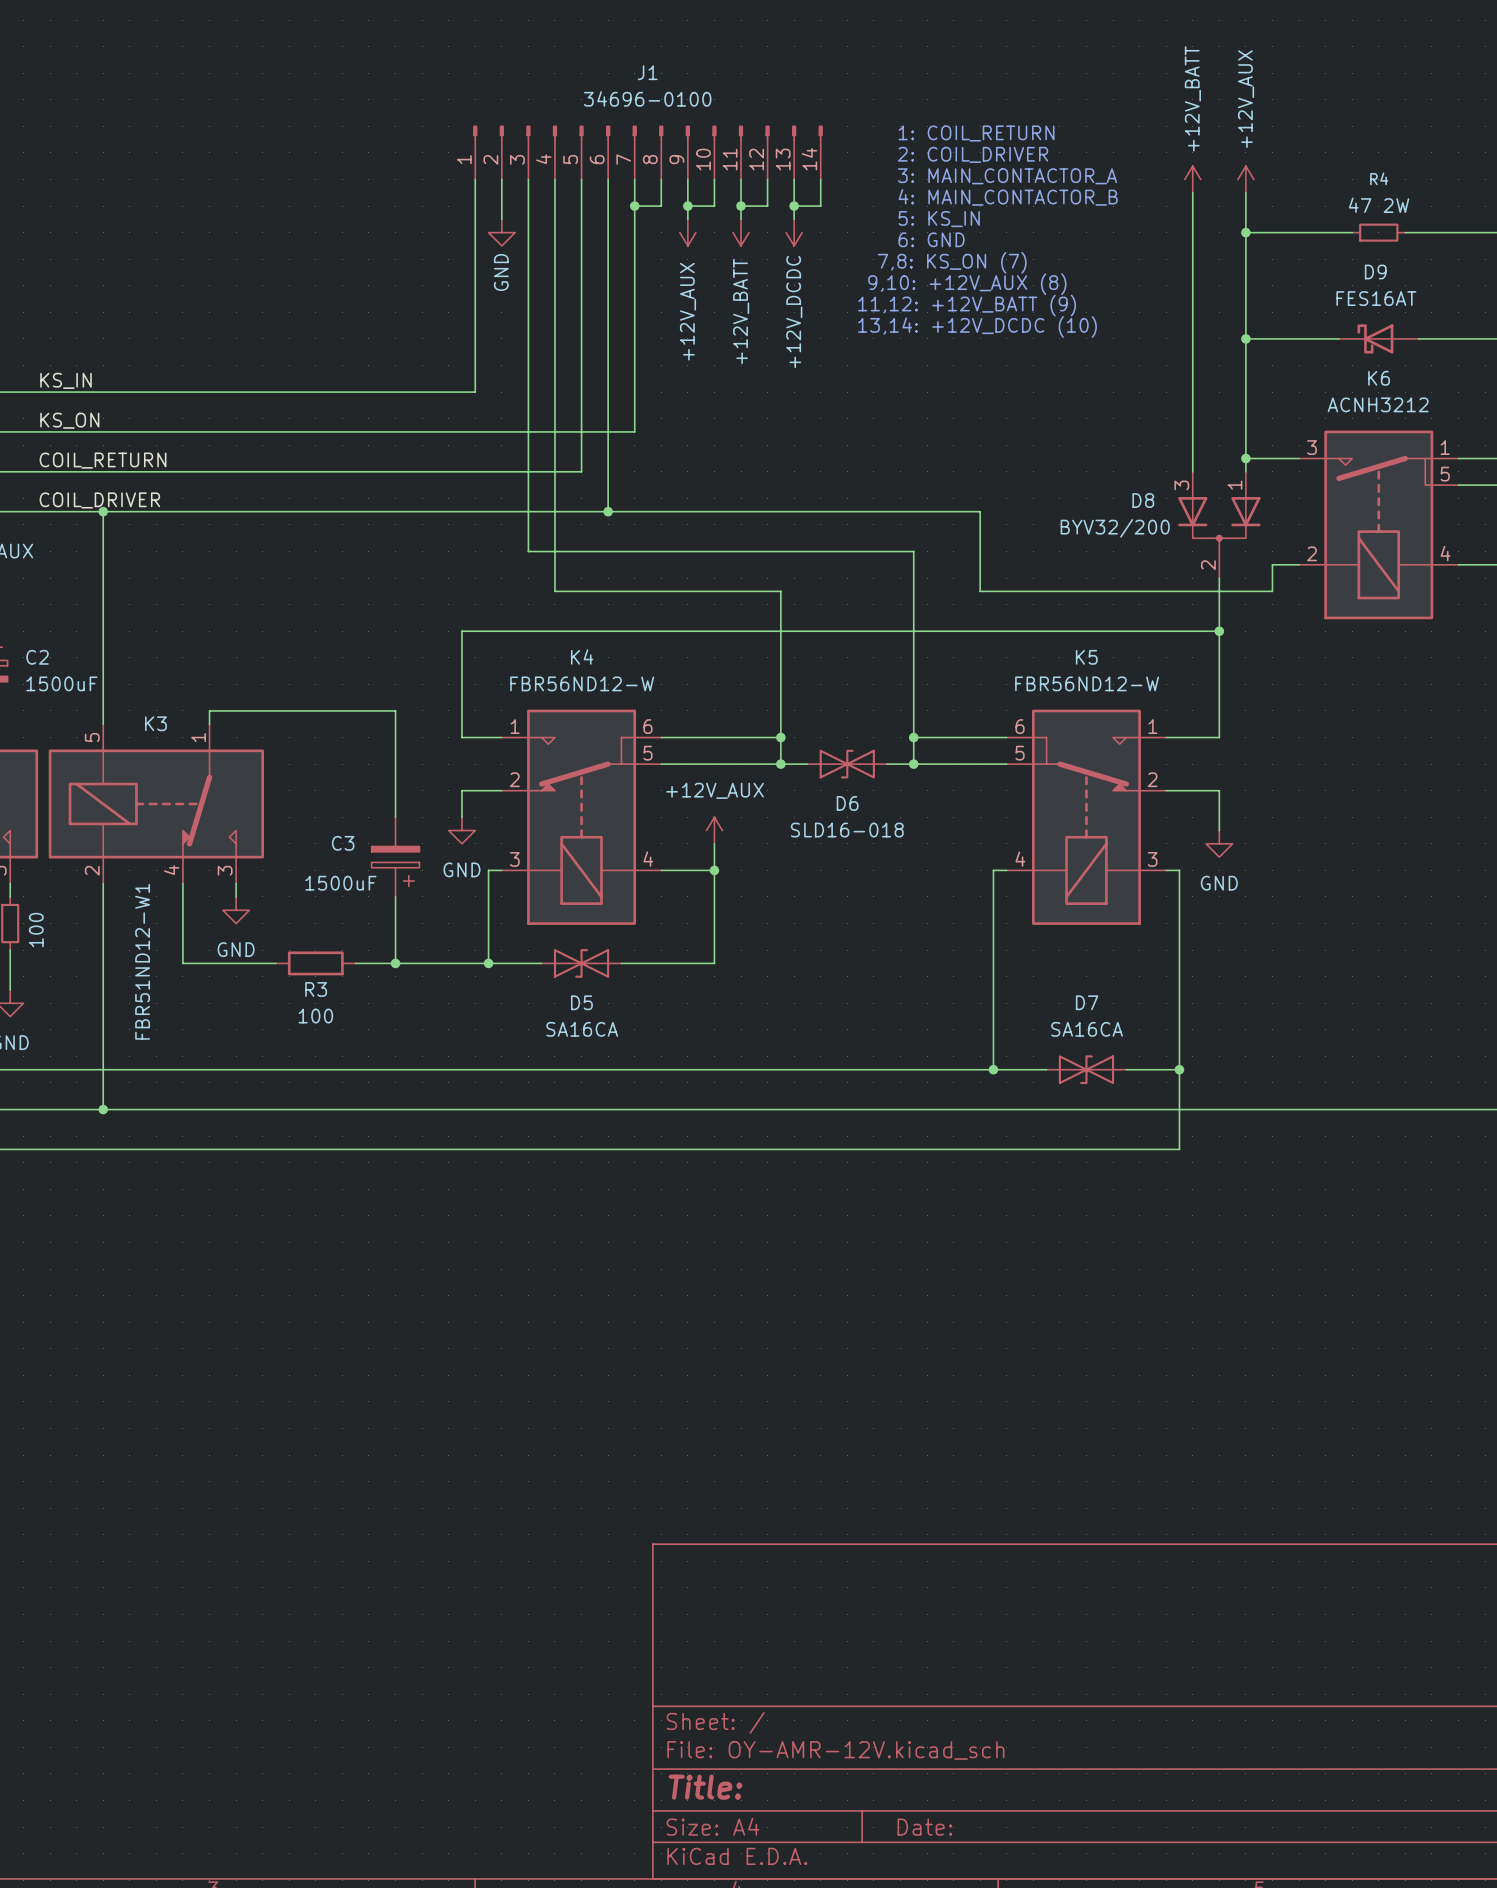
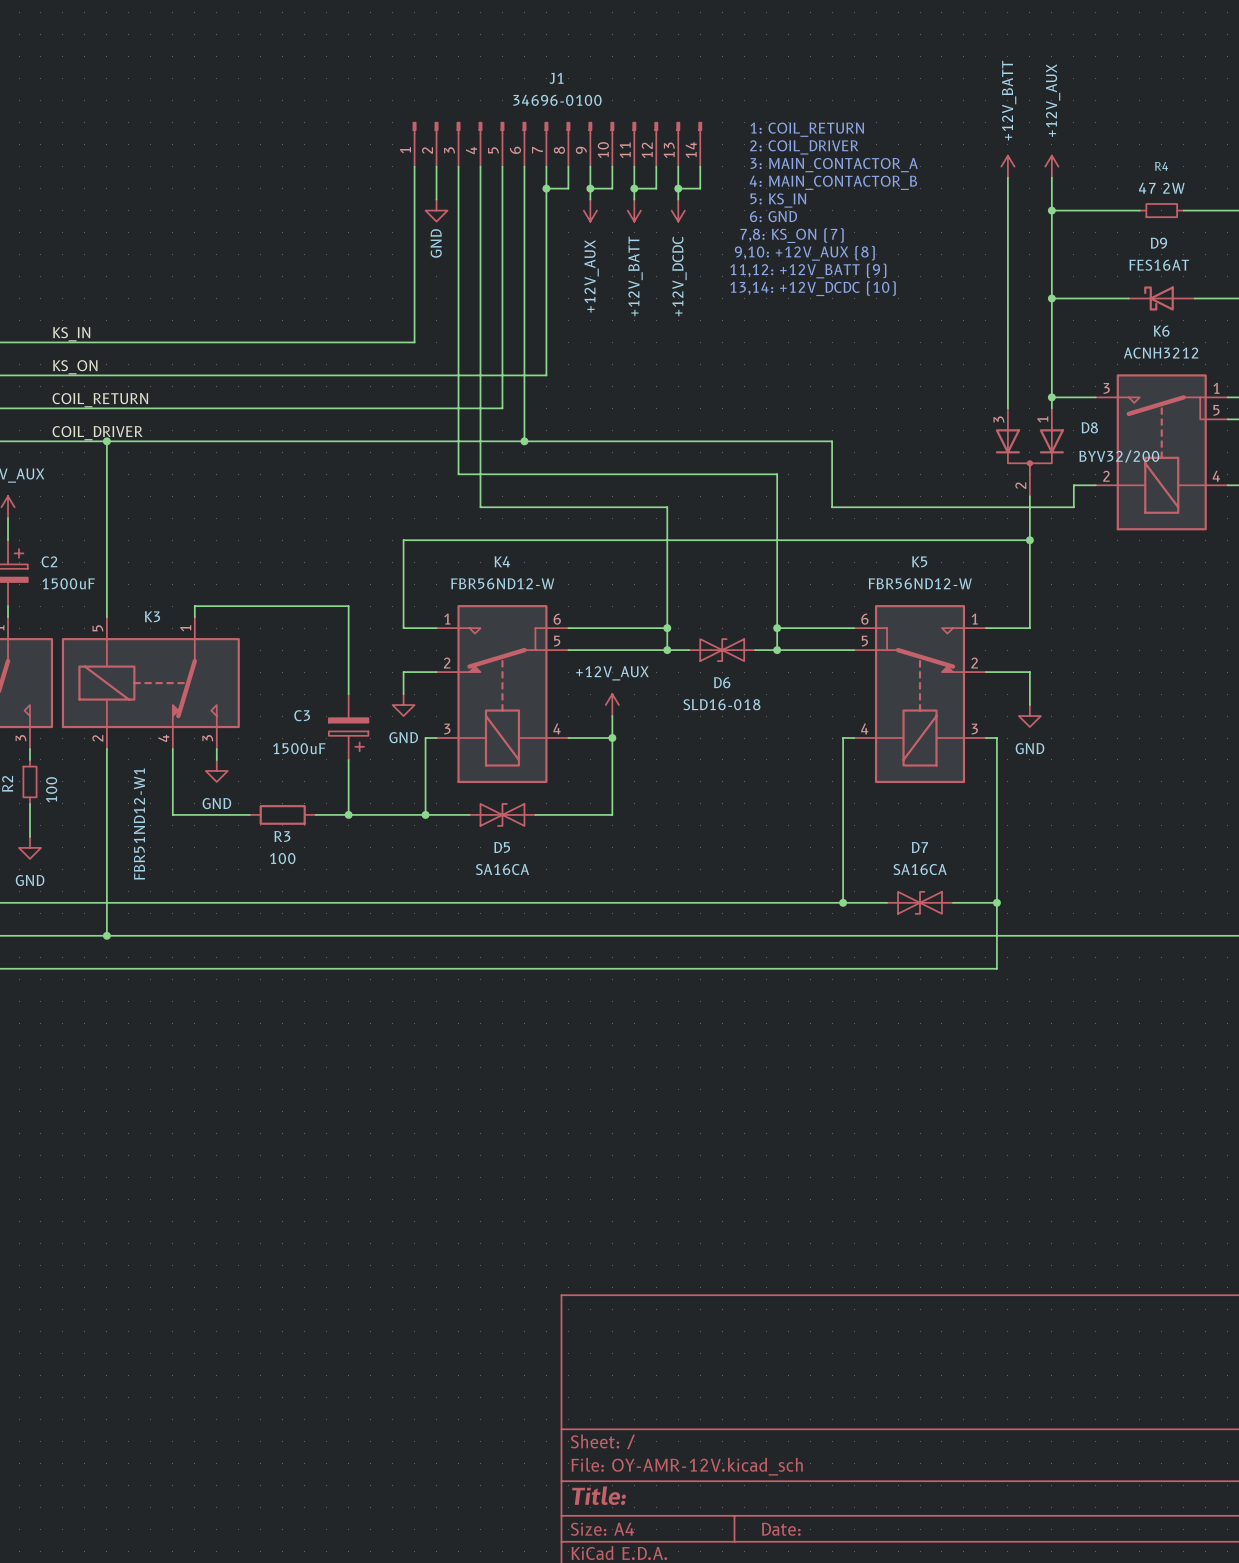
D8 name position: D8 (1143, 500) -> D8 (1089, 427)
D8 value position: BYV32/200 (1115, 528) -> BYV32/200 (1119, 456)

